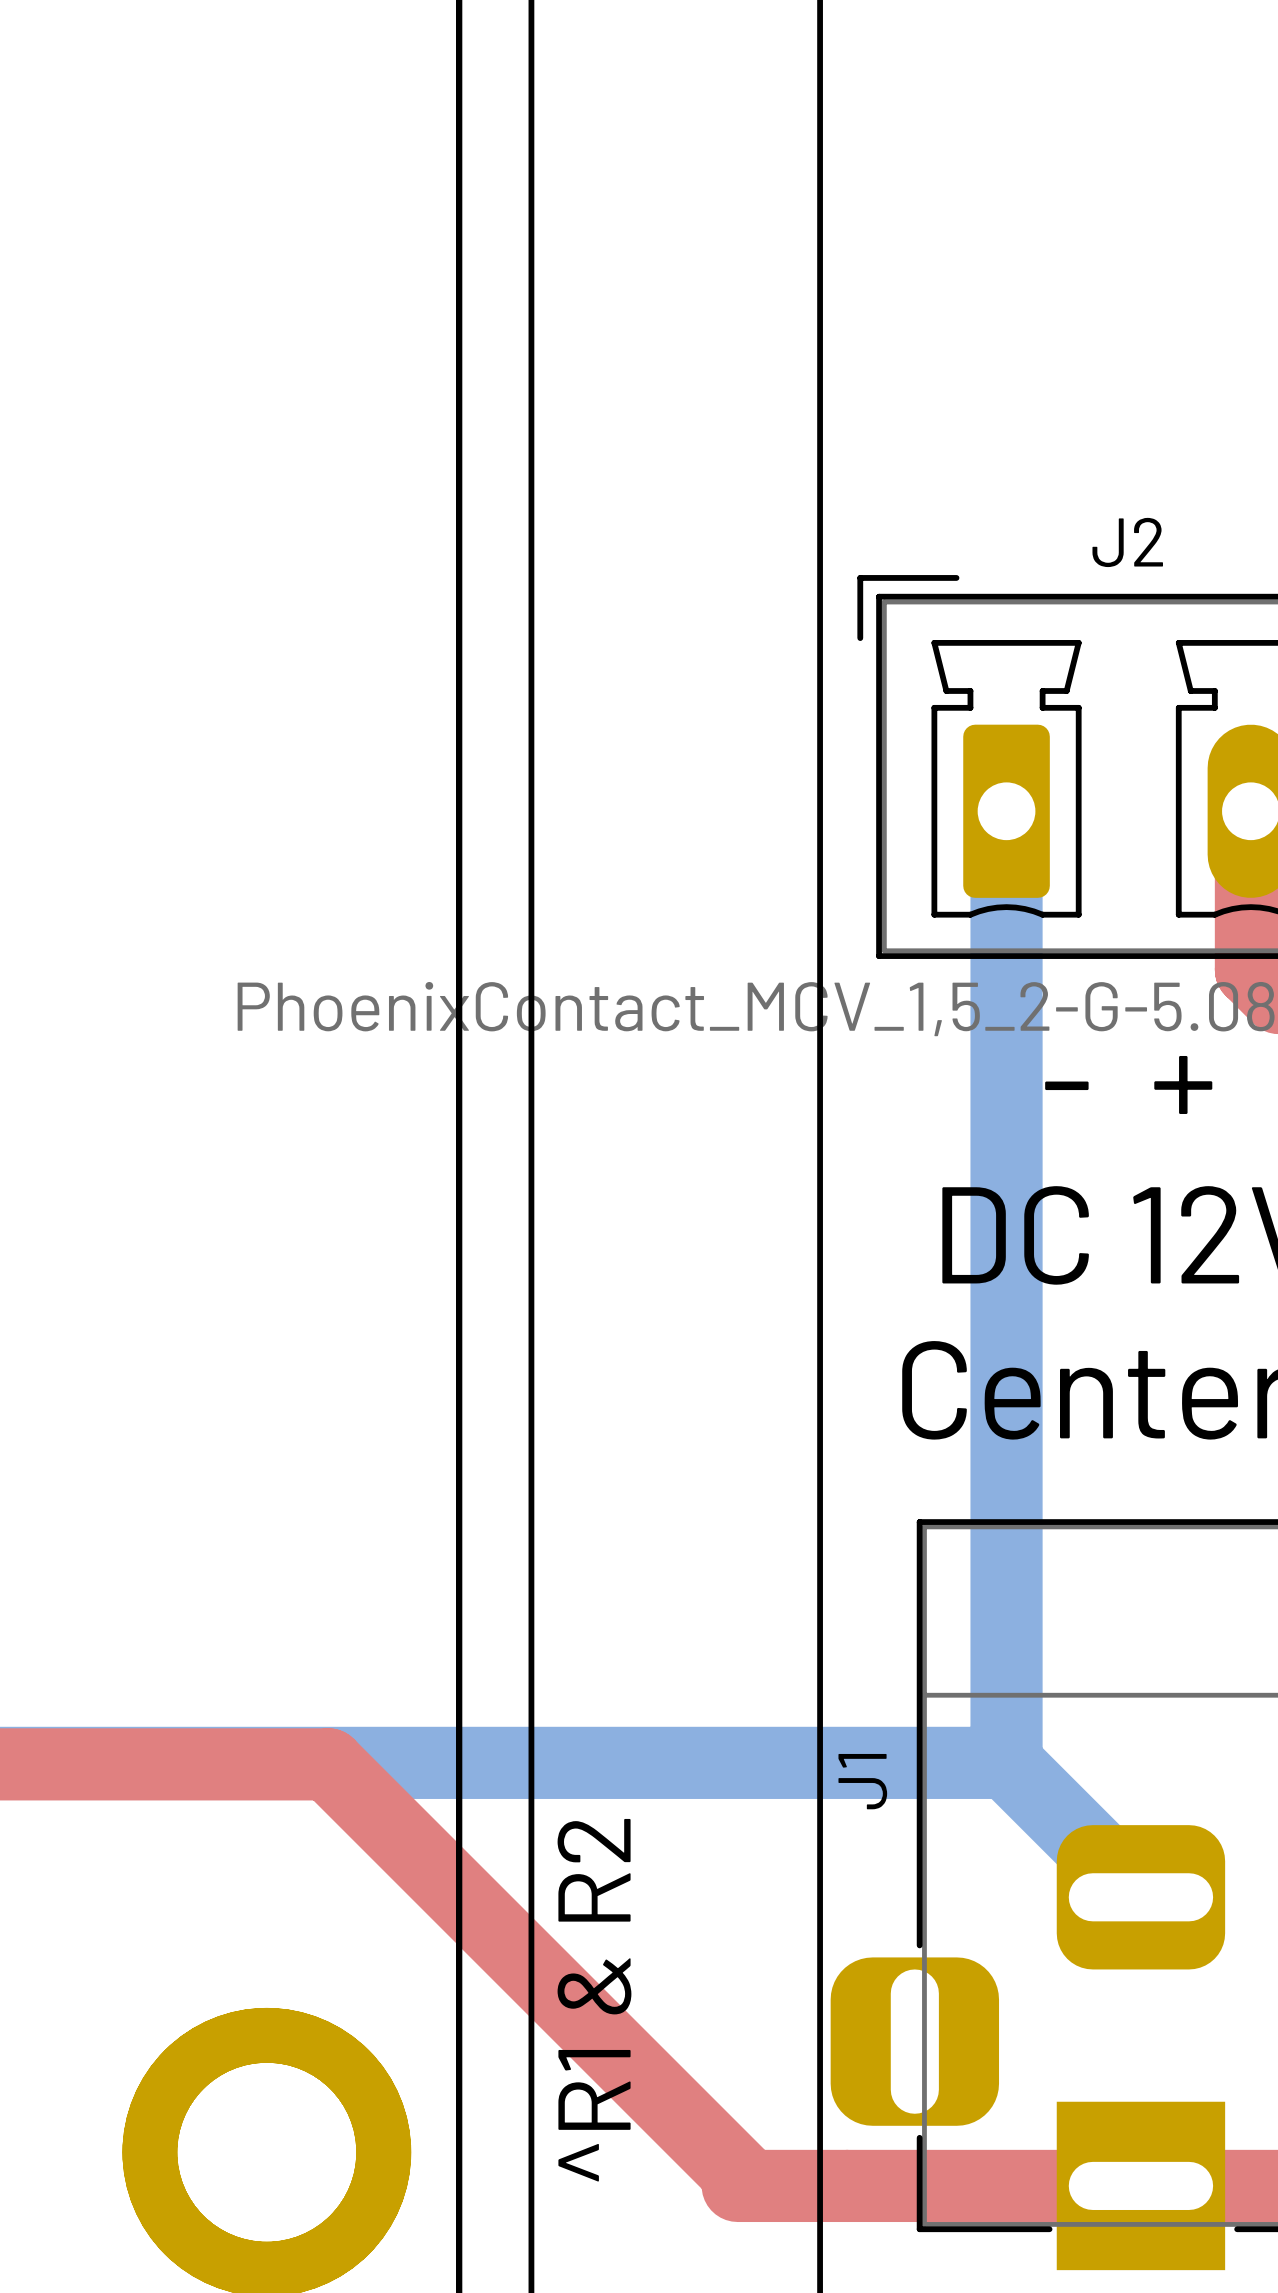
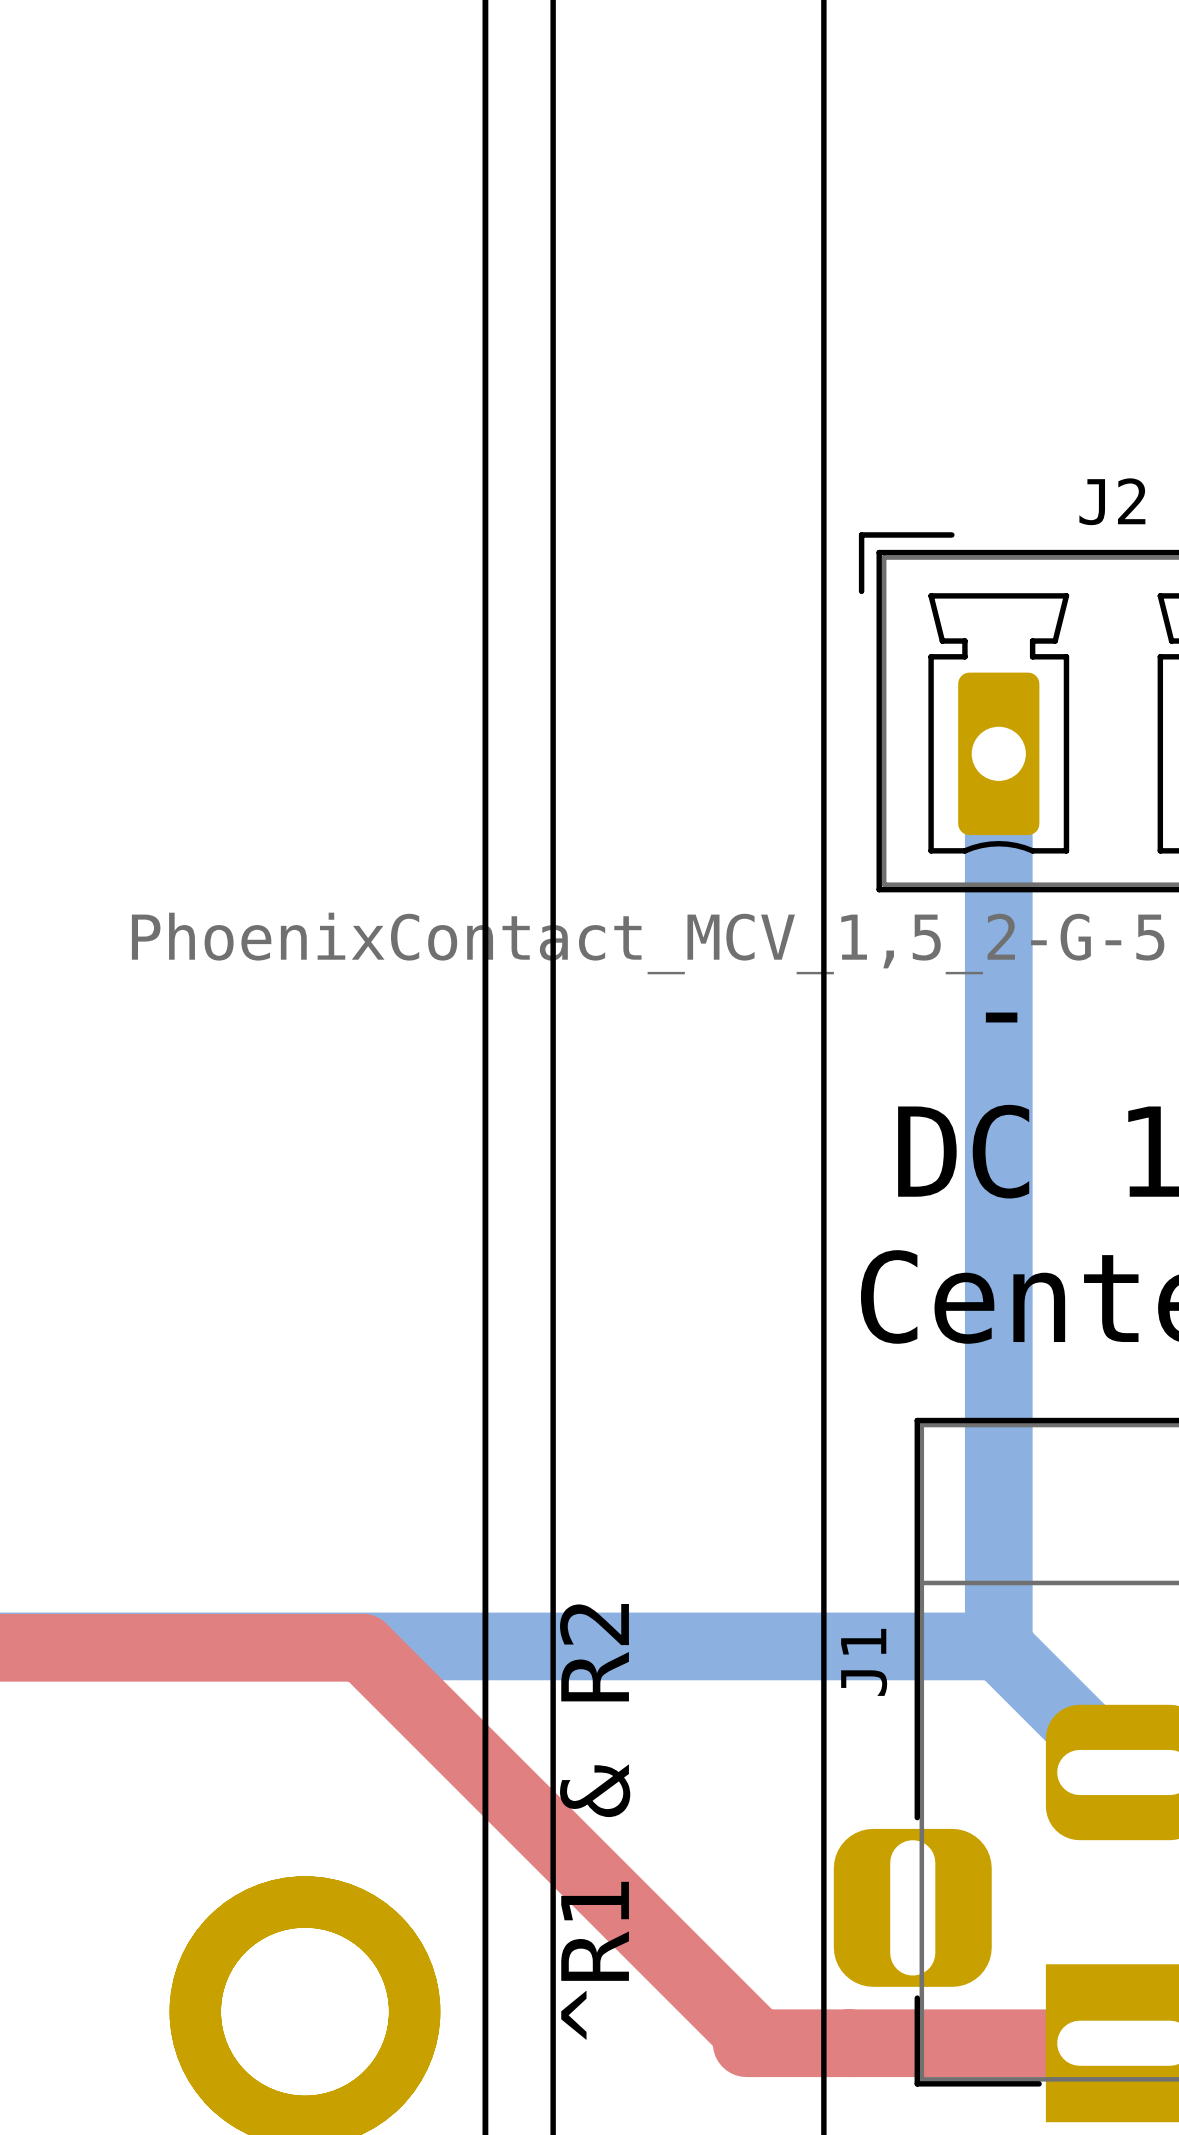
text position: ^R1 & R2 (594, 2000) -> ^R1 & R2 (595, 1821)

